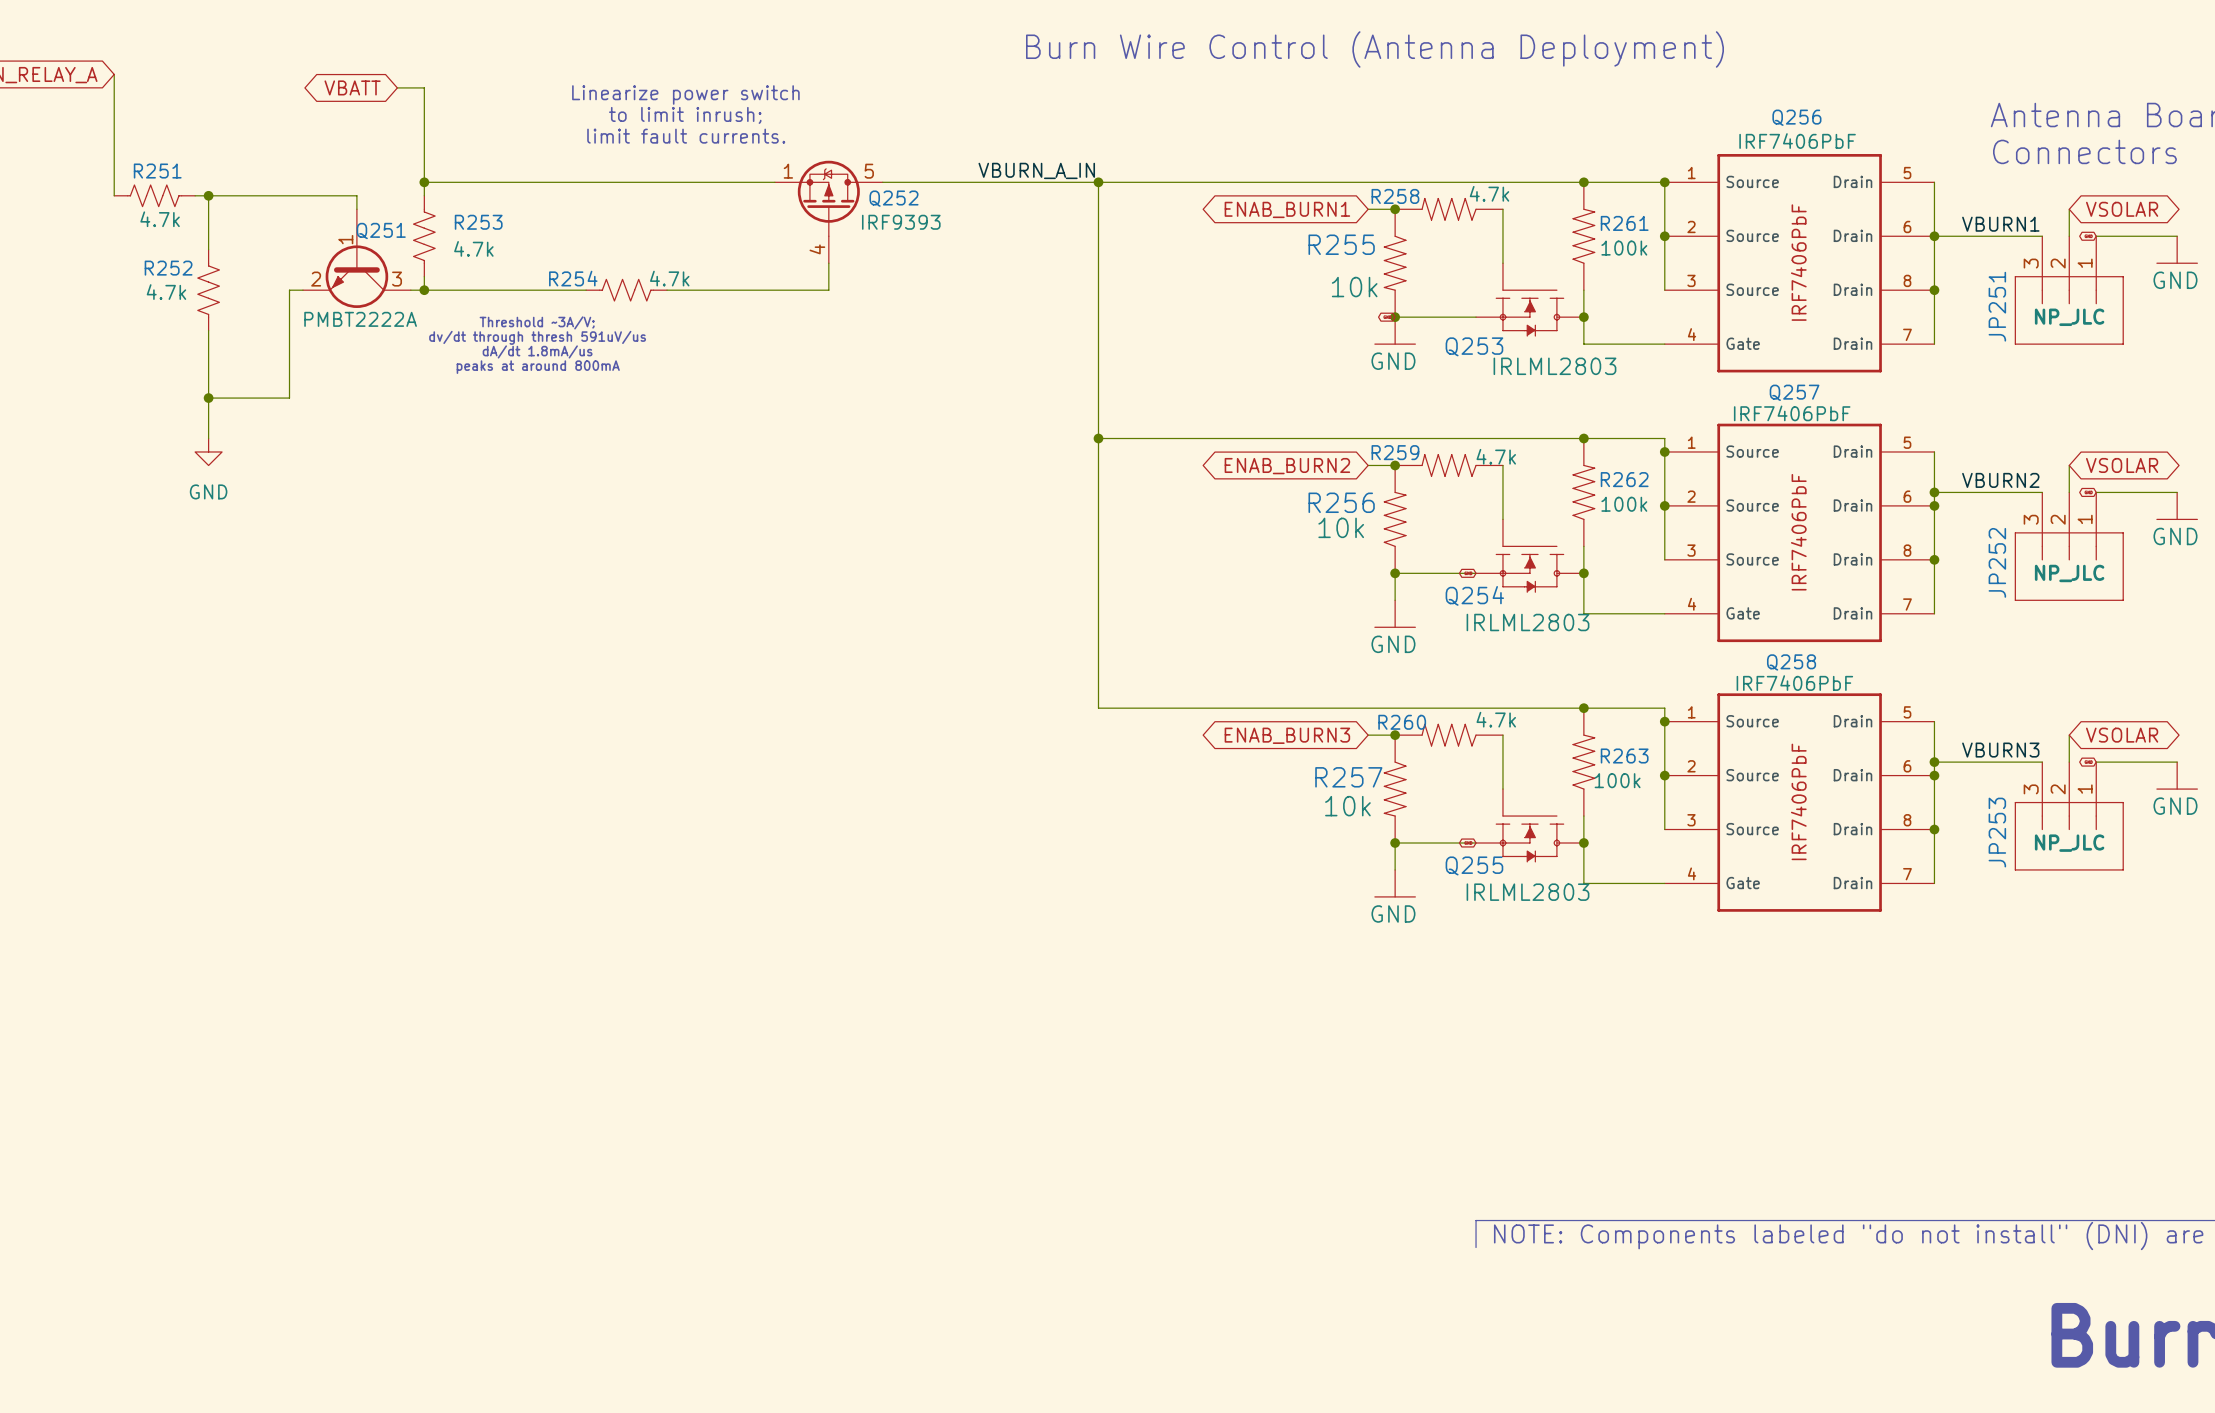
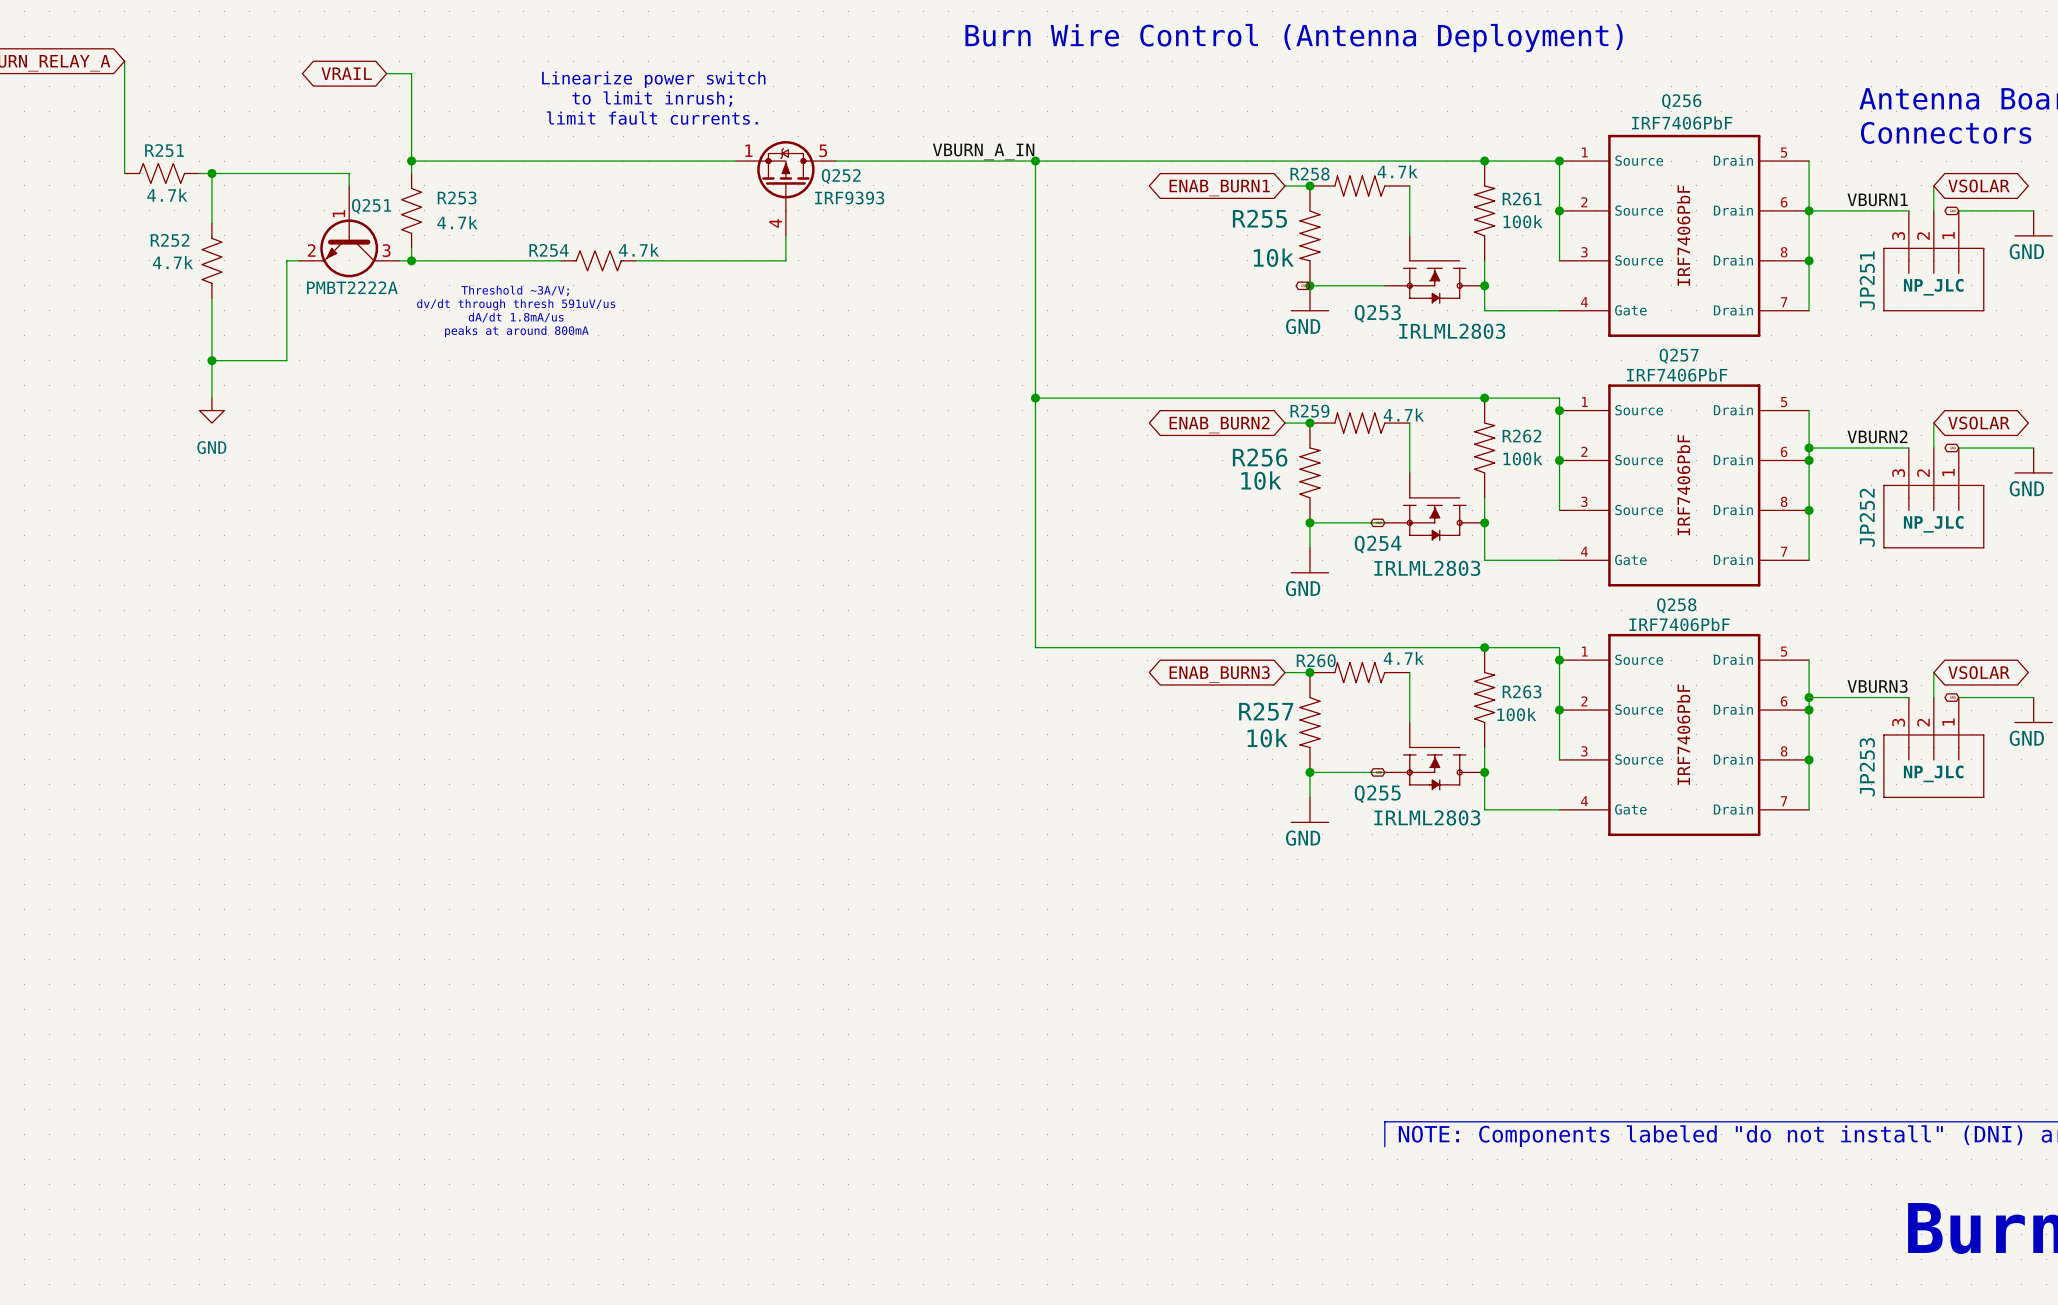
global label: VBATT (352, 87) -> VRAIL (346, 73)

